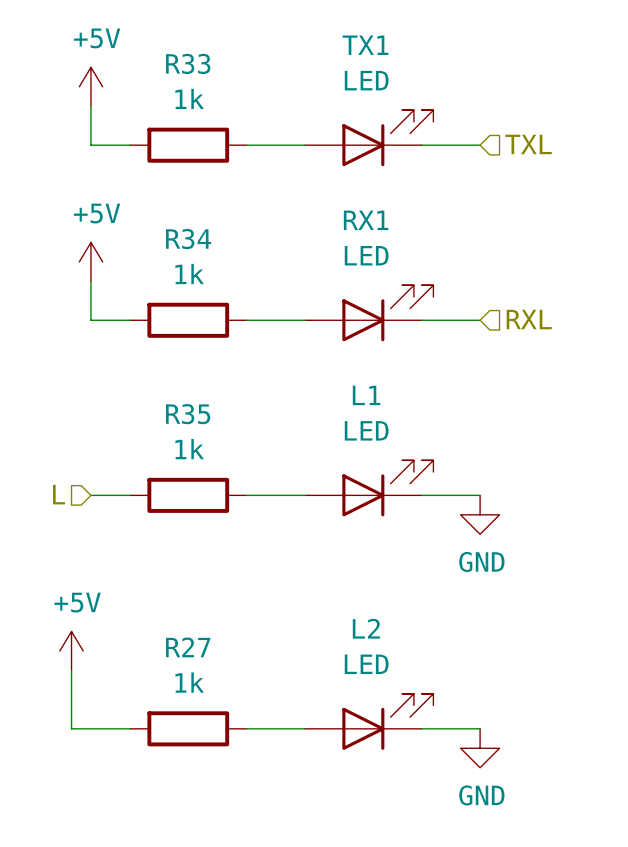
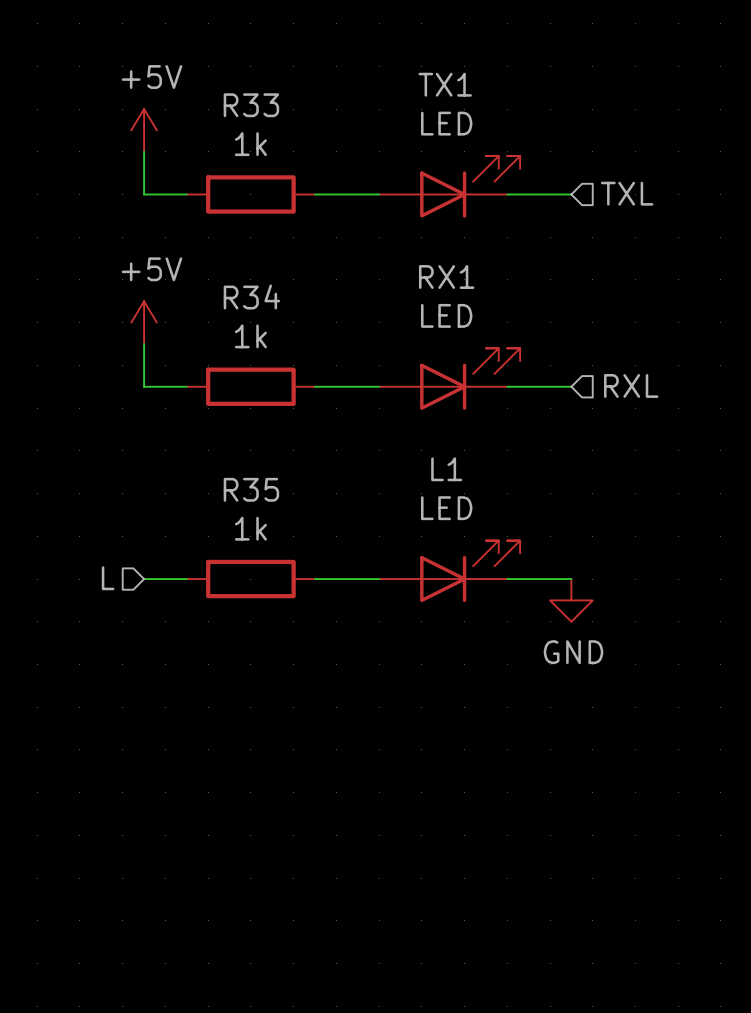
power symbol: +5V (71, 651) -> none
wire: (71, 670) (71, 728) (129, 728) -> none
L2: LED (369, 721) -> none
R27: 1k (188, 728) -> none
wire: (246, 728) (304, 728) -> none
wire: (421, 728) (480, 728) -> none
power symbol: GND (480, 748) -> none

